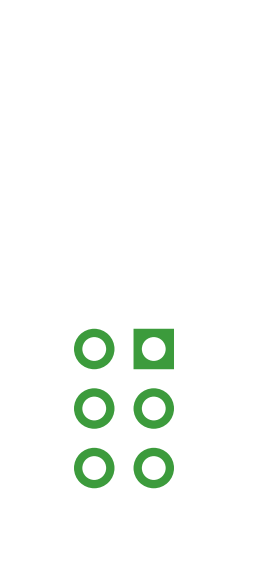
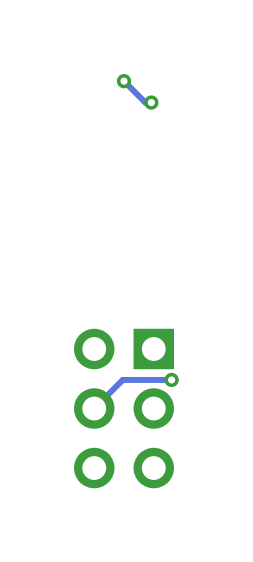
track: none -> (124, 81) (145, 102) (151, 102)
via: none -> (124, 81)
via: none -> (151, 102)
track: none -> (171, 379) (122, 379) (94, 408)
via: none -> (171, 379)

